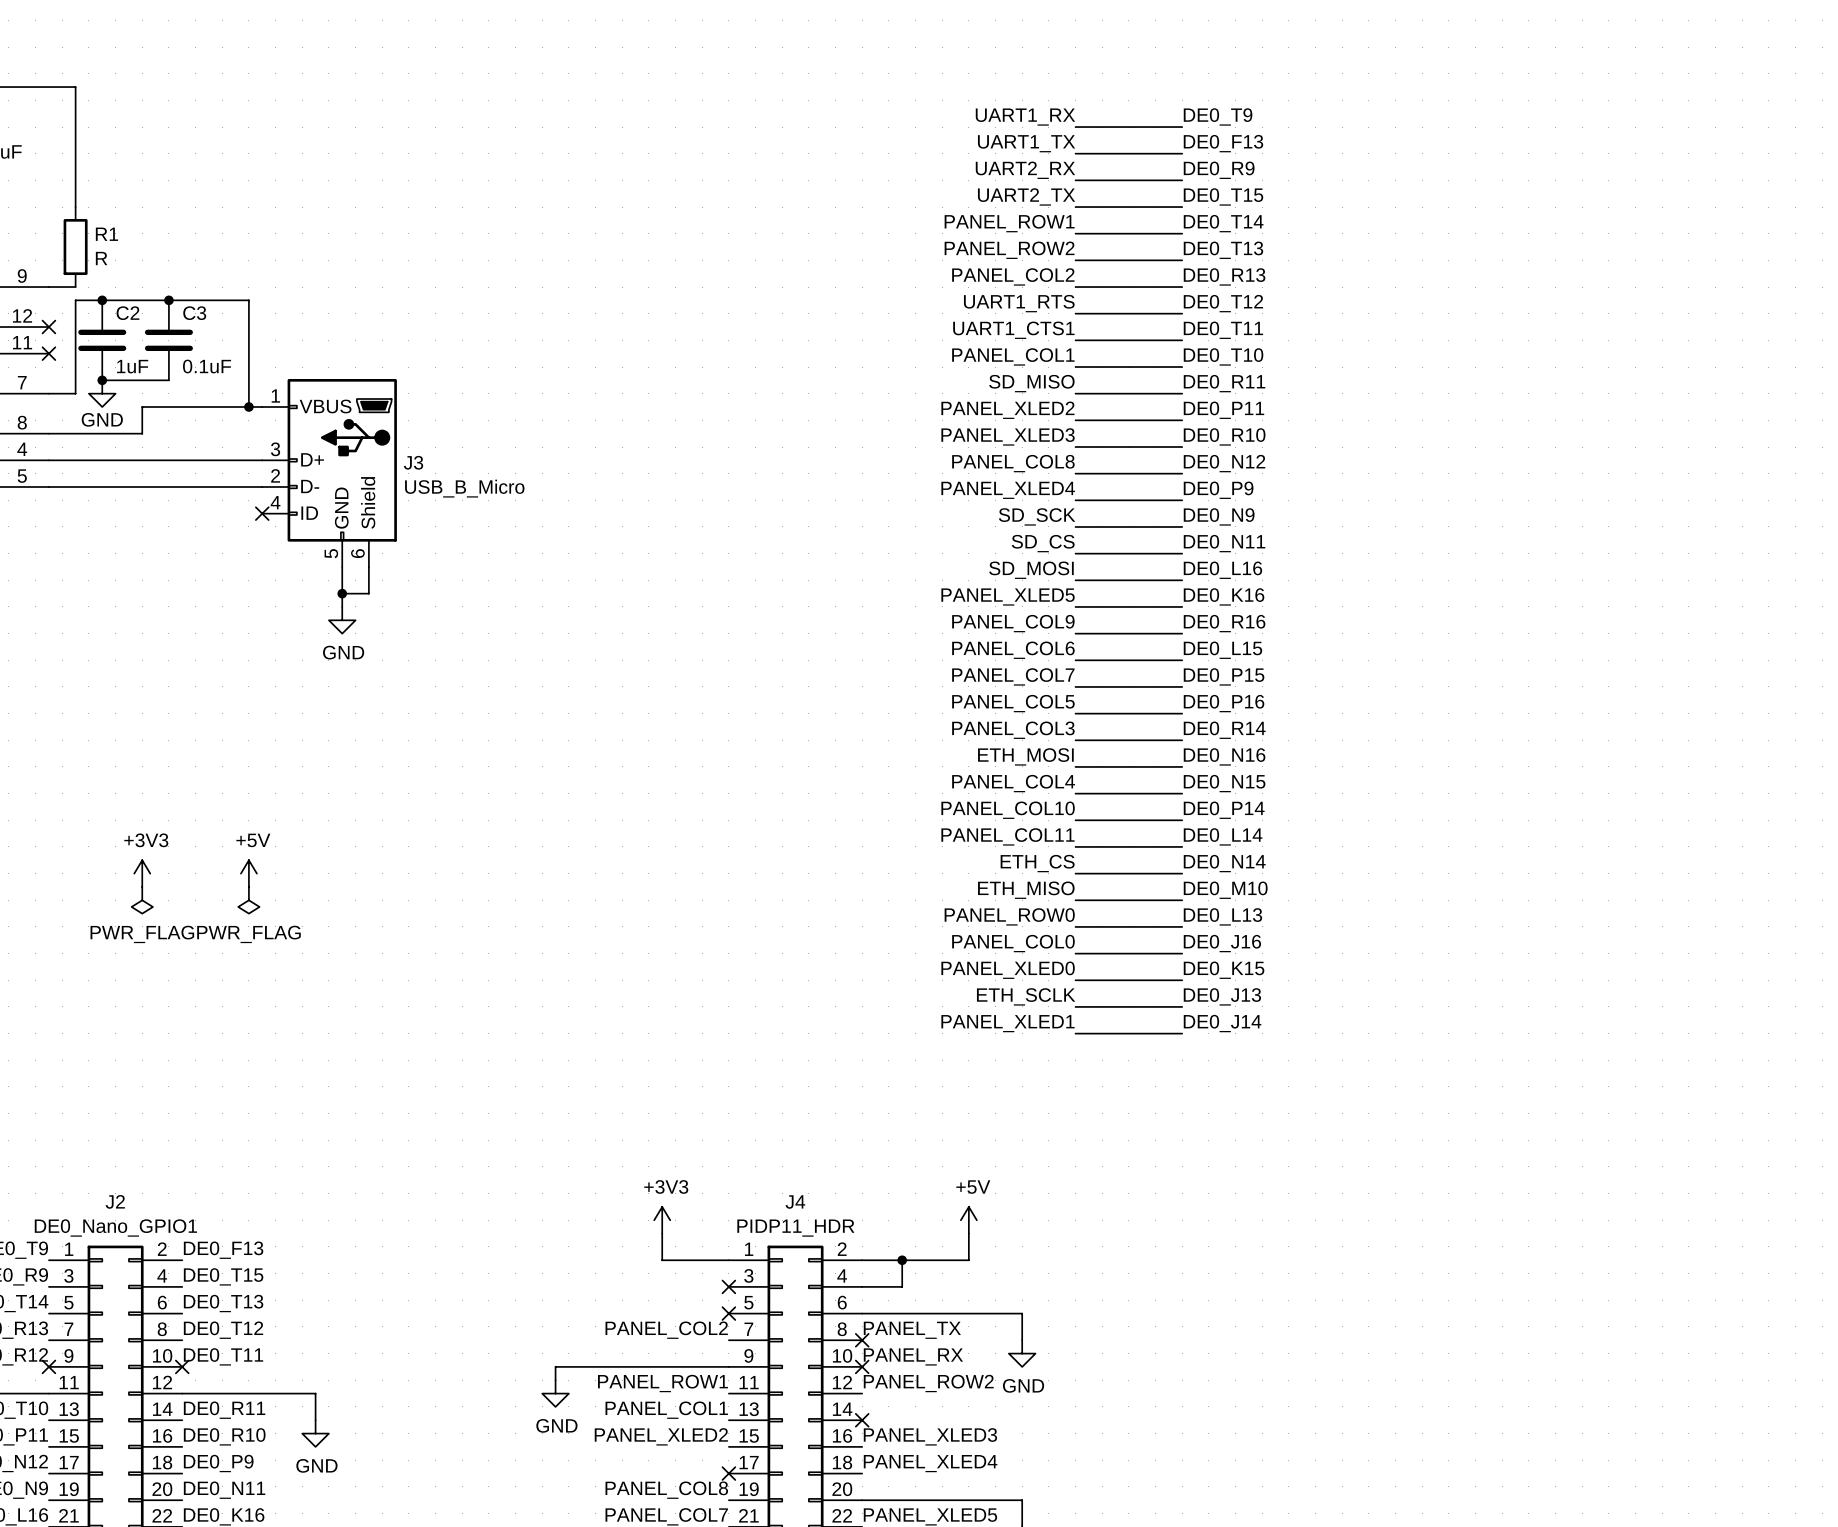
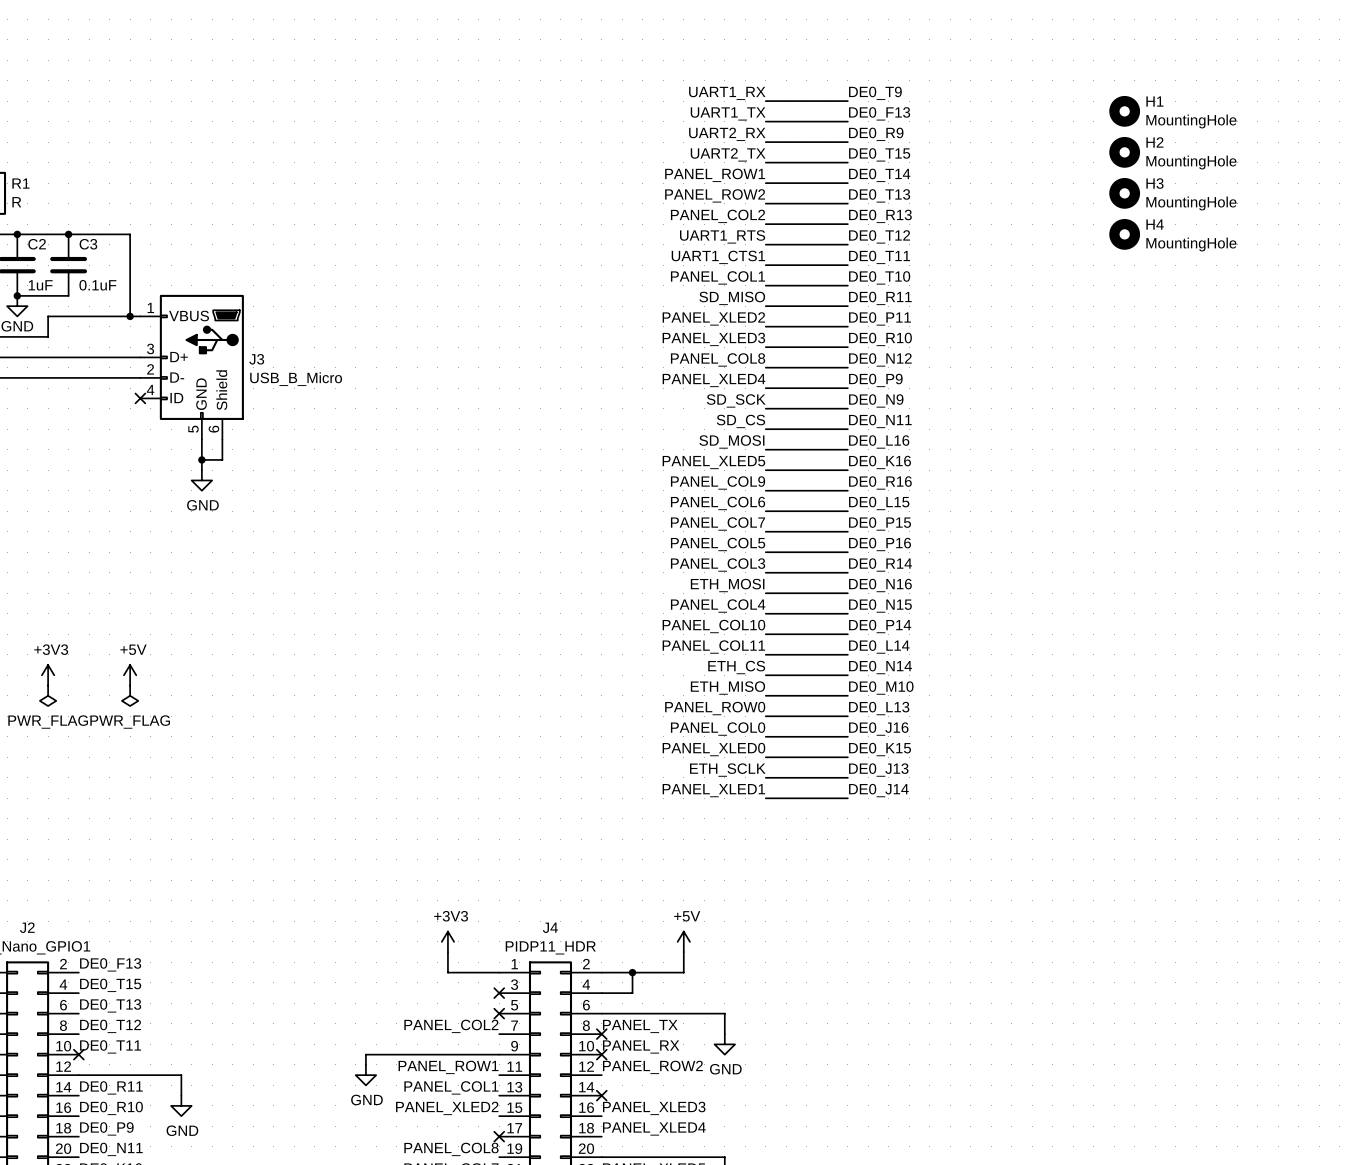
H1: none -> MountingHole (1124, 111)
H2: none -> MountingHole (1124, 152)
H3: none -> MountingHole (1124, 193)
H4: none -> MountingHole (1124, 234)

